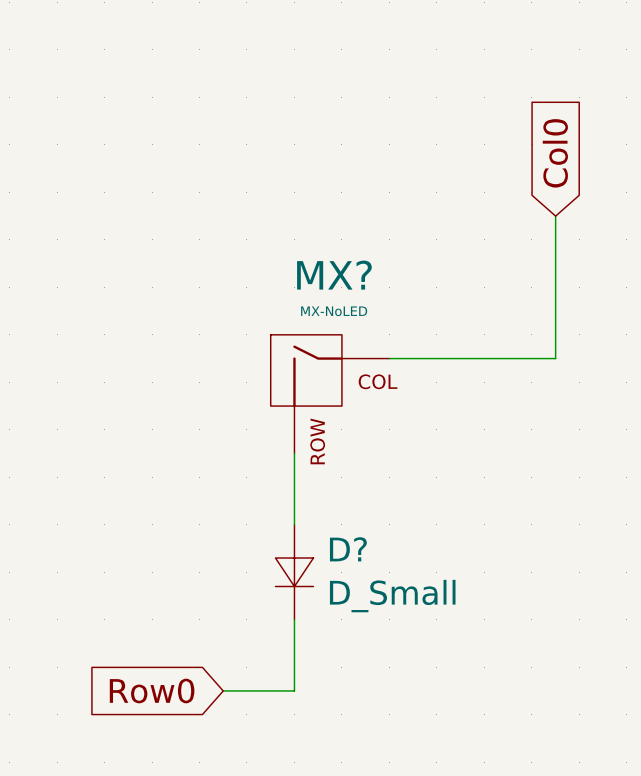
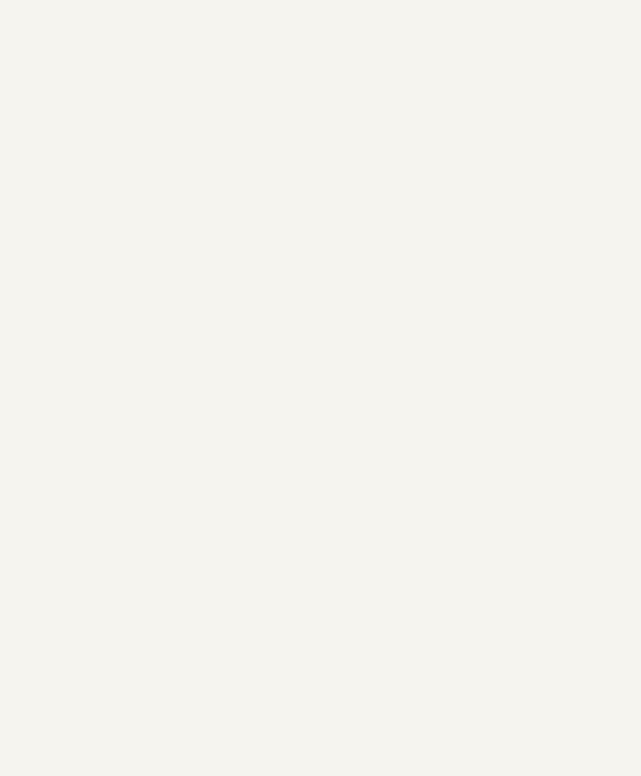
global label: Col0 (555, 153) -> none
wire: (555, 216) (555, 358) (389, 358) -> none
MX?: MX-NoLED (330, 394) -> none
wire: (294, 453) (294, 524) -> none
D?: D_Small (294, 572) -> none
wire: (294, 619) (294, 690) (223, 690) -> none
global label: Row0 (152, 690) -> none

